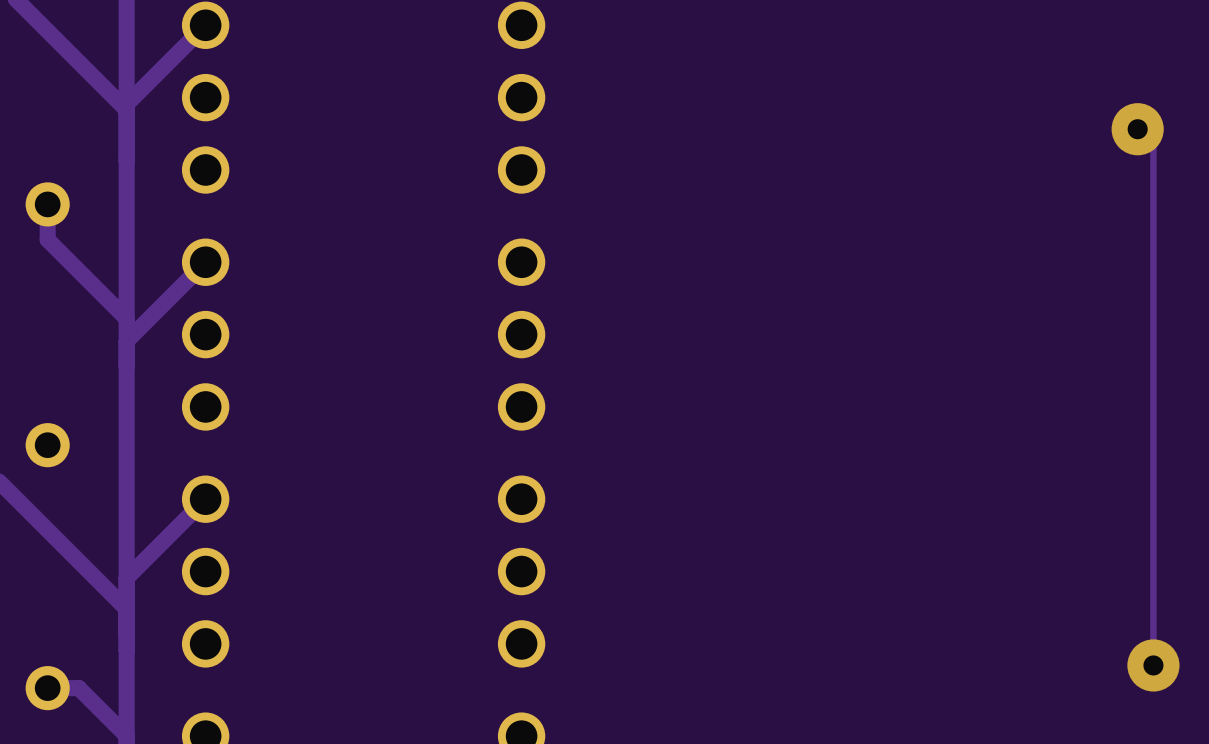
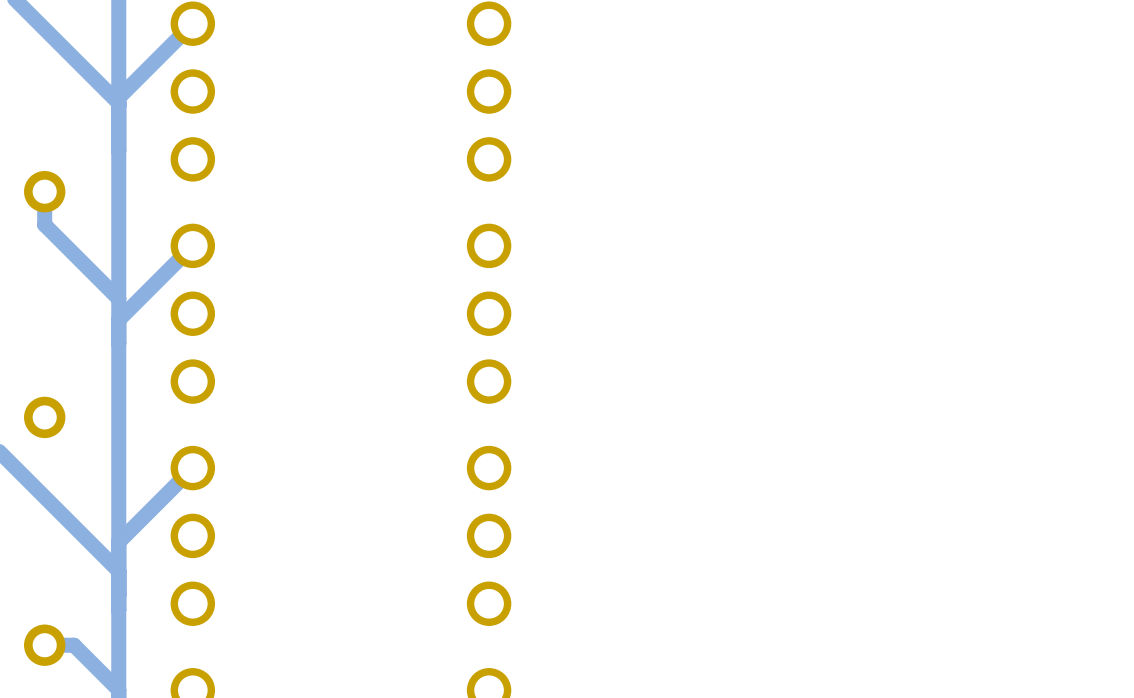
track: (1137, 129) (1153, 145) (1153, 665) -> none
via: (1137, 129) -> none
via: (1153, 665) -> none

